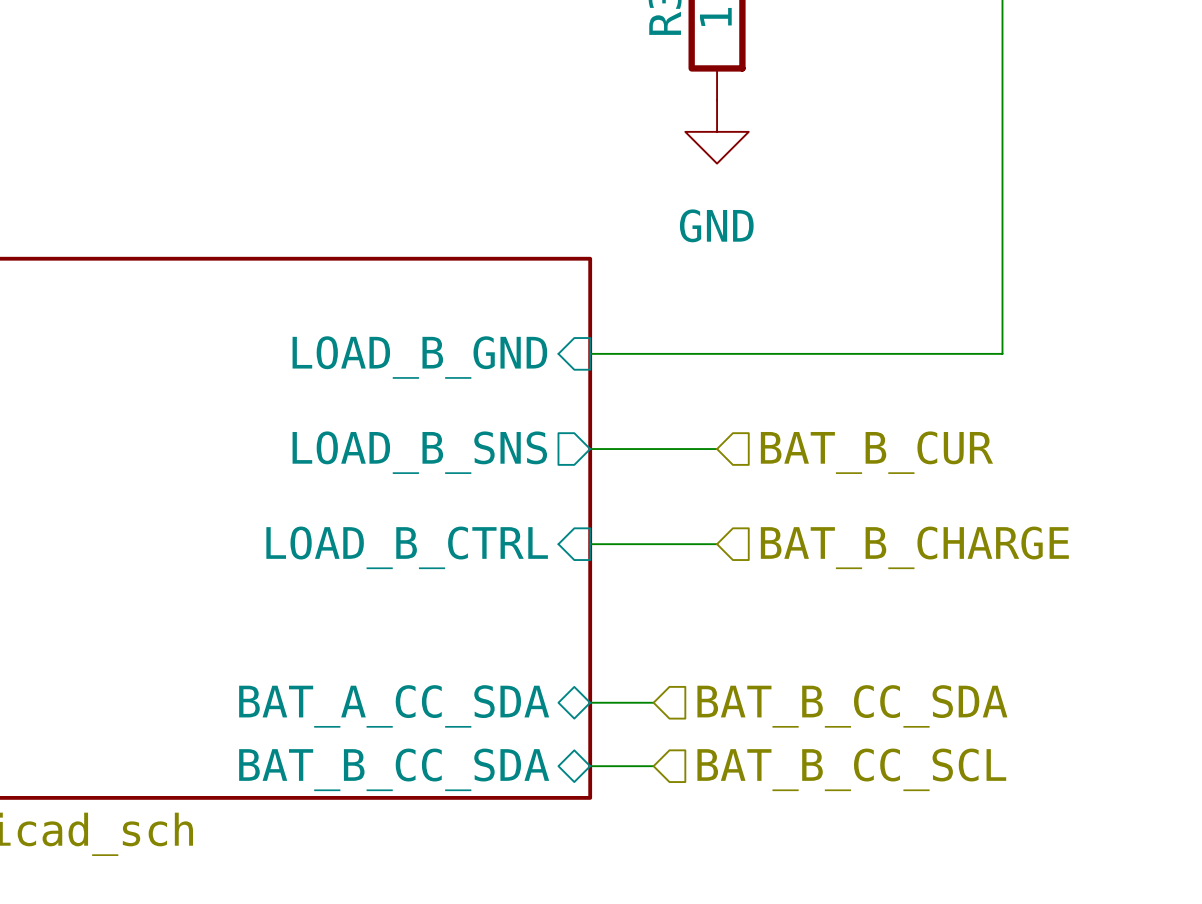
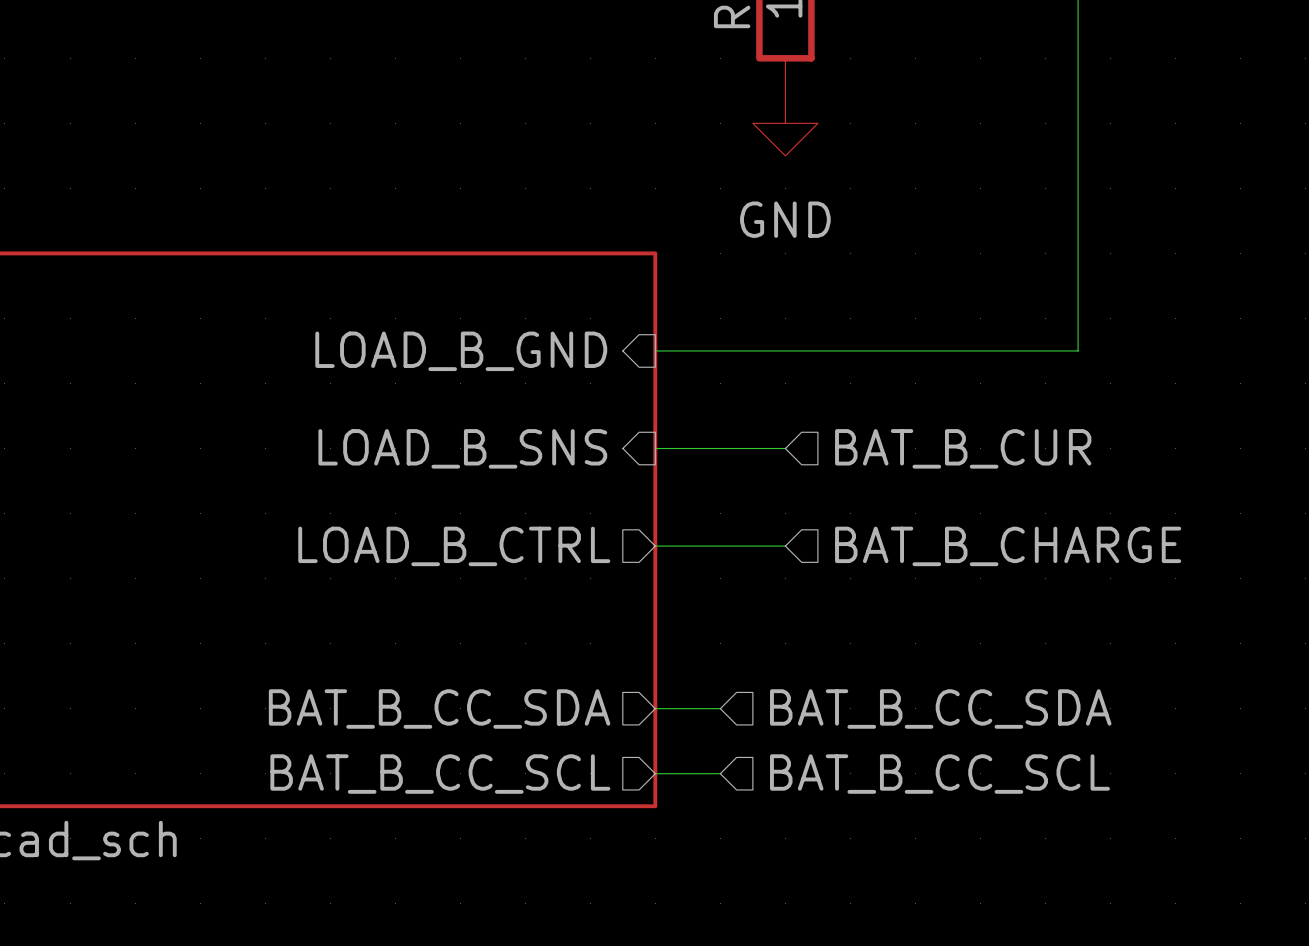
sheet pin shape: output (419, 452) -> input (462, 448)
sheet pin shape: input (407, 547) -> output (454, 546)
sheet pin shape: bidirectional (394, 706) -> output (439, 709)
sheet pin: BAT_A_CC_SDA (394, 706) -> BAT_B_CC_SDA (439, 709)
sheet pin shape: bidirectional (394, 769) -> output (440, 774)
sheet pin: BAT_B_CC_SDA (394, 769) -> BAT_B_CC_SCL (440, 774)

